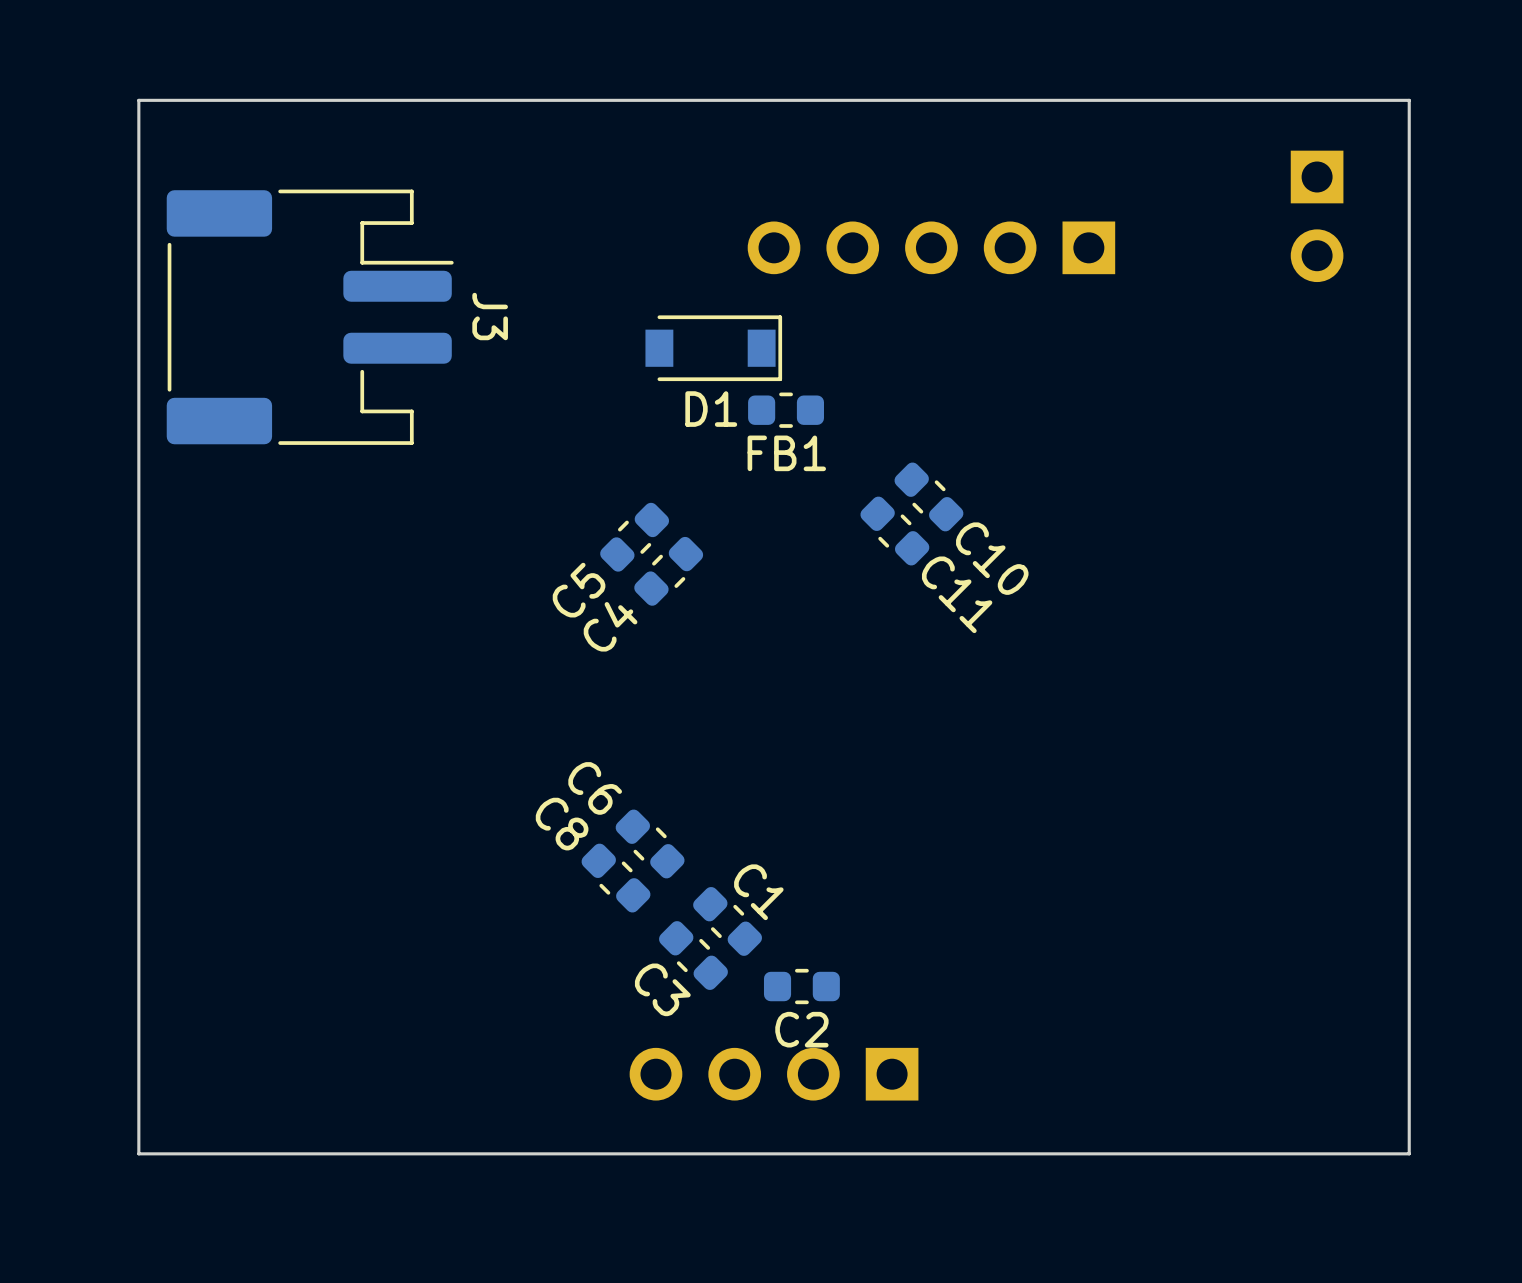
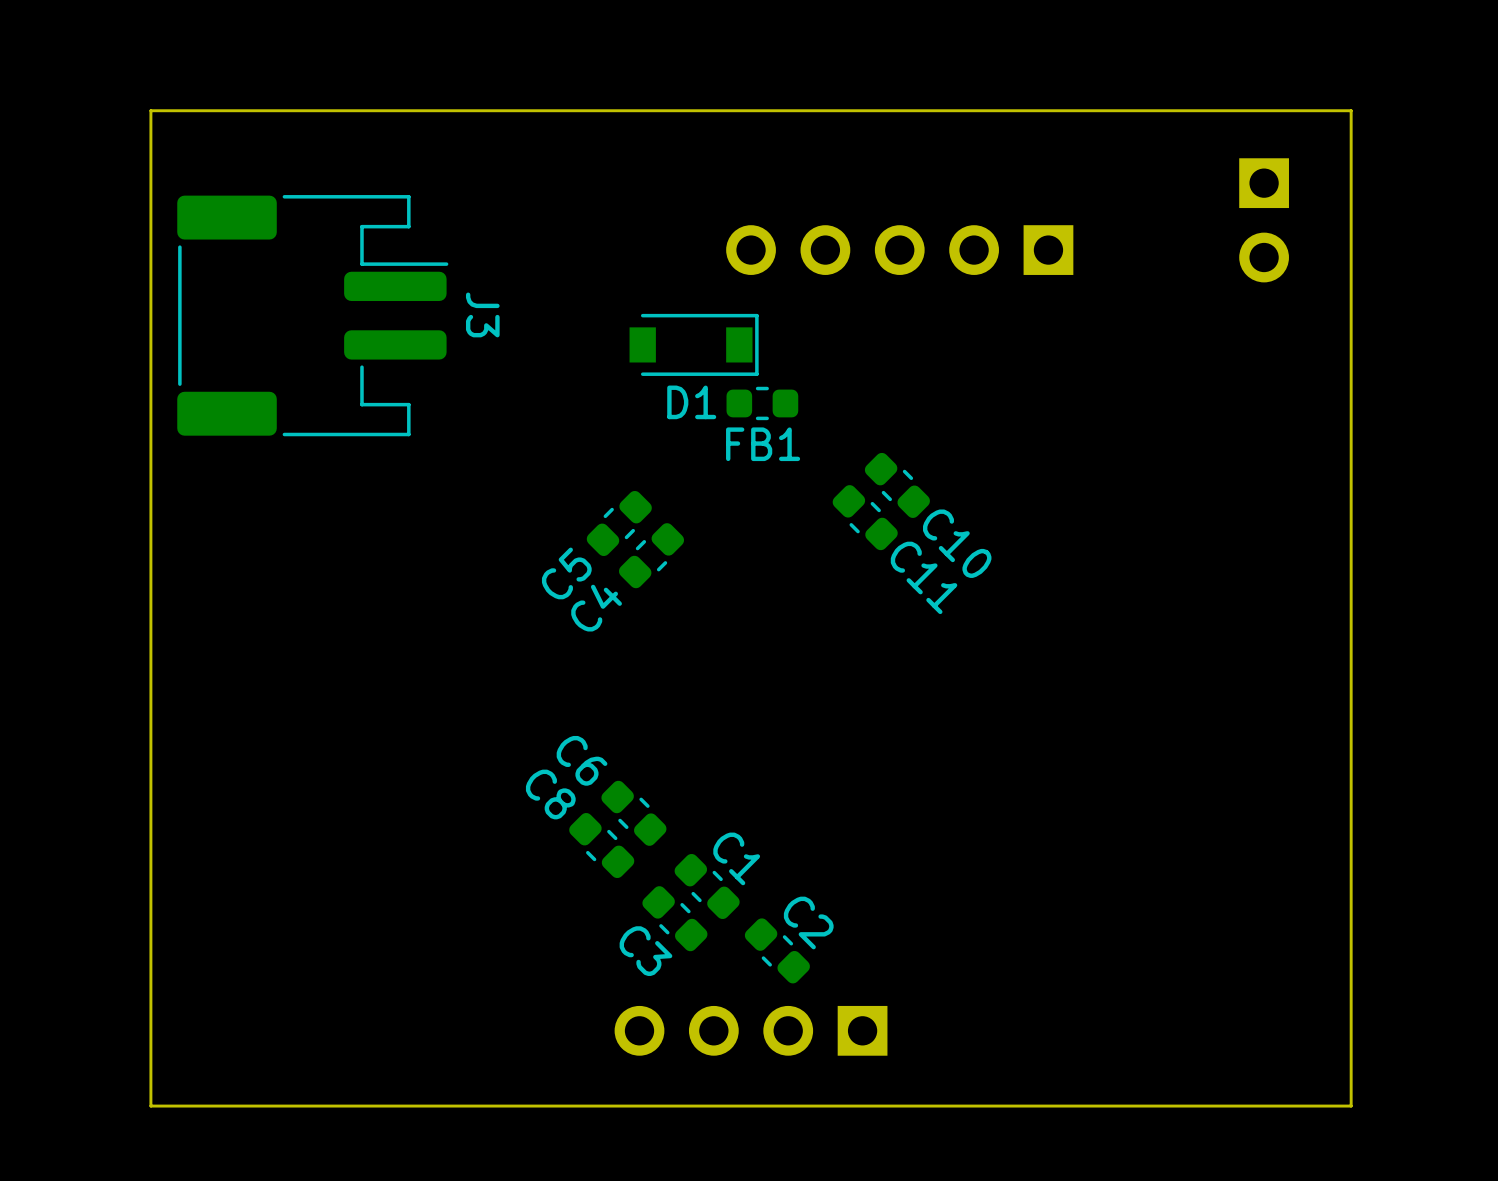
C2 rotation: 0° (801, 986) -> 45° clockwise (777, 950)
C2 name position: C2 (801, 1029) -> C2 (808, 922)

